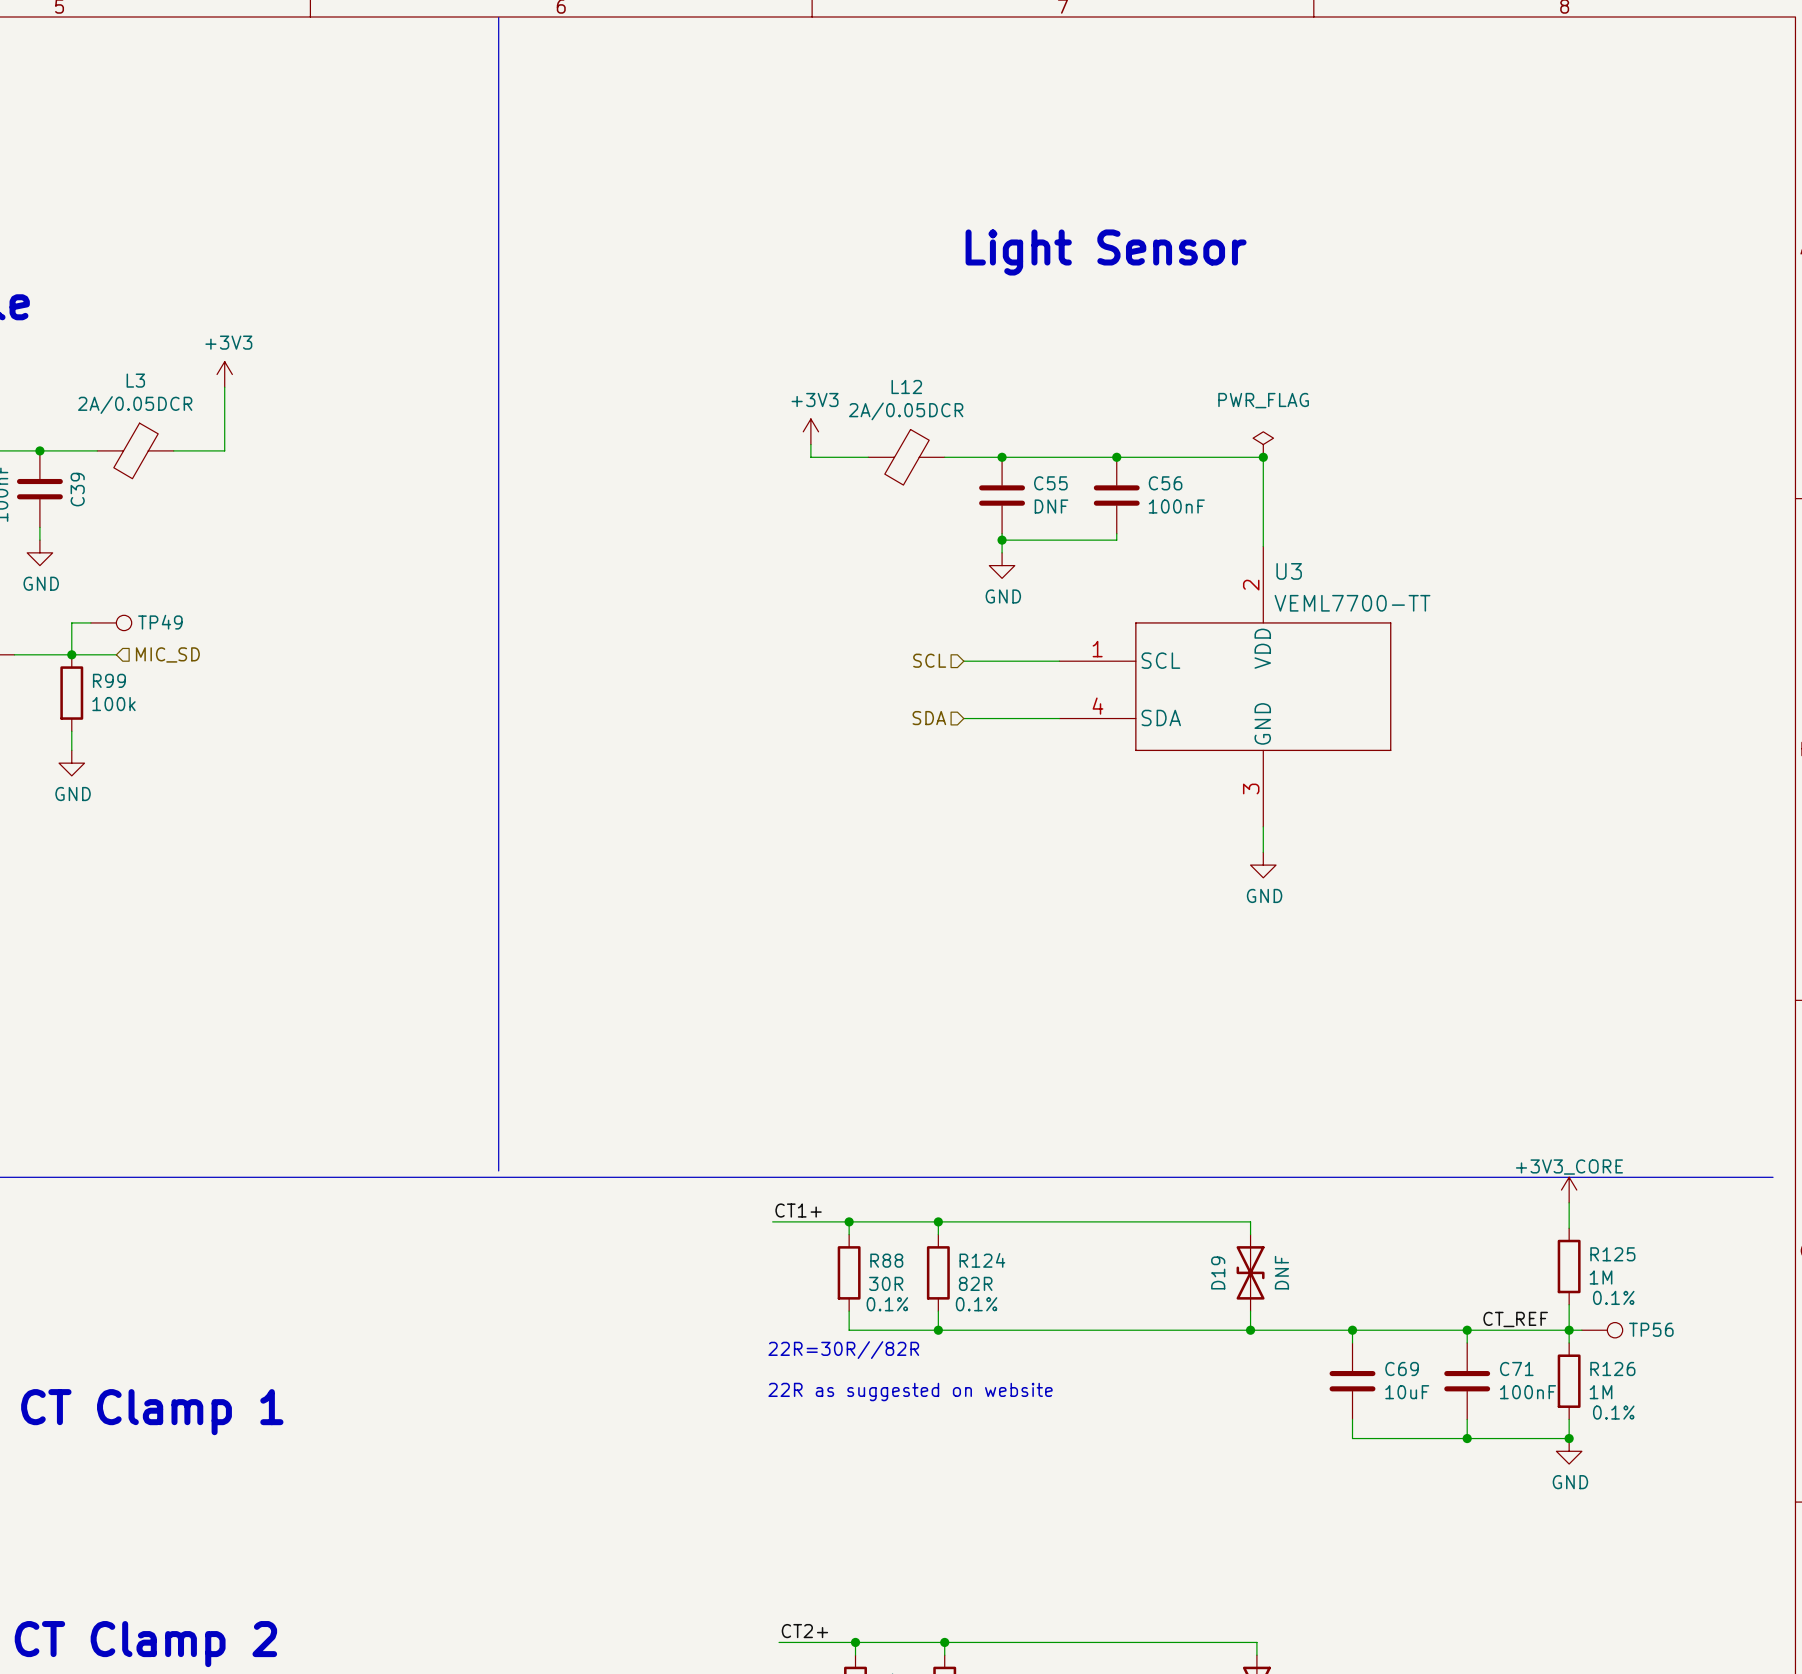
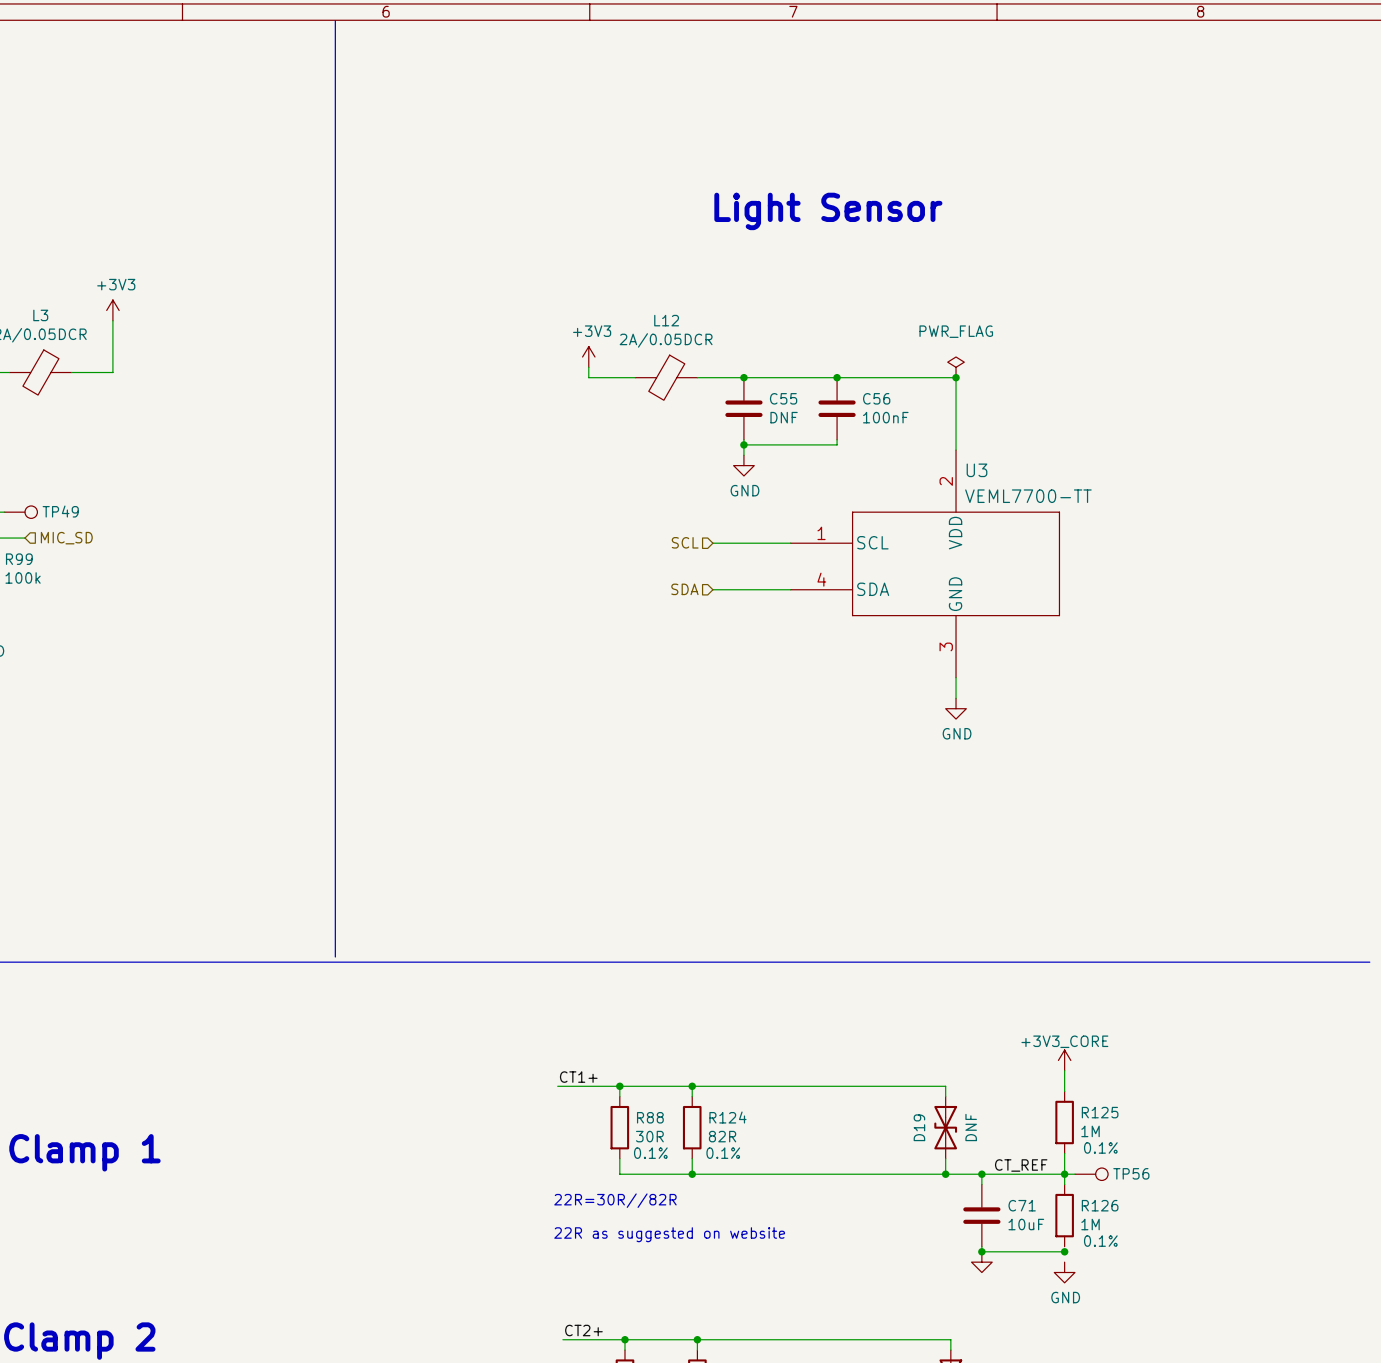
power symbol position: +3V3_CORE (1569, 1190) -> +3V3_CORE (1064, 1060)
wire: (1569, 1202) (1569, 1228) -> (1064, 1070) (1064, 1091)
label position: CT1+ (798, 1210) -> CT1+ (578, 1077)
wire: (772, 1221) (1250, 1221) (1250, 1234) -> none
wire: (849, 1221) (849, 1234) -> none
junction: (849, 1221) -> none
wire: (938, 1221) (938, 1234) -> none
junction: (938, 1221) -> none
R125 position: (1569, 1266) -> (1064, 1122)
R88 position: (849, 1272) -> (619, 1127)
R124 position: (938, 1272) -> (692, 1127)
D19 position: (1250, 1272) -> (945, 1127)
wire: (1569, 1304) (1569, 1342) -> (1064, 1153) (1064, 1184)
wire: (849, 1311) (849, 1330) -> (692, 1158) (692, 1174)
wire: (938, 1311) (938, 1330) -> (692, 1096) (692, 1086)
wire: (1250, 1311) (1250, 1330) (1581, 1330) -> none
label position: CT_REF (1515, 1319) -> CT_REF (1021, 1165)
wire: none -> (557, 1086) (619, 1086) (619, 1096)
junction: none -> (619, 1086)
junction: (1250, 1330) -> none
wire: (1352, 1330) (1352, 1342) -> (945, 1086) (945, 1096)
junction: (1352, 1330) -> none
wire: (1467, 1330) (1467, 1342) -> (981, 1174) (981, 1184)
junction: (1467, 1330) -> none
junction: (1569, 1330) -> none
TP56 position: (1602, 1330) -> (1091, 1174)
text position: 22R=30R//82R (843, 1350) -> 22R=30R//82R (615, 1200)
C69: 10uF (1352, 1381) -> none
C71 position: (1467, 1381) -> (981, 1215)
R126 position: (1569, 1381) -> (1064, 1215)
text position: 22R as suggested on website (910, 1392) -> 22R as suggested on website (669, 1234)
C71 value: 100nF (1528, 1392) -> 10uF (1026, 1224)
wire: (1352, 1419) (1352, 1438) -> (619, 1158) (619, 1174) (1028, 1174)
wire: (1467, 1419) (1467, 1438) -> (945, 1158) (945, 1174)
wire: (1569, 1419) (1569, 1438) (1409, 1438) -> none
junction: none -> (692, 1174)
junction: none -> (945, 1174)
junction: none -> (981, 1174)
junction: none -> (1064, 1174)
junction: (1467, 1438) -> none
junction: (1569, 1438) -> none
power symbol position: GND (1569, 1451) -> GND (1064, 1272)
wire: none -> (981, 1246) (981, 1251) (1064, 1251)
junction: none -> (981, 1251)
junction: none -> (1064, 1251)
power symbol: none -> (981, 1262)

